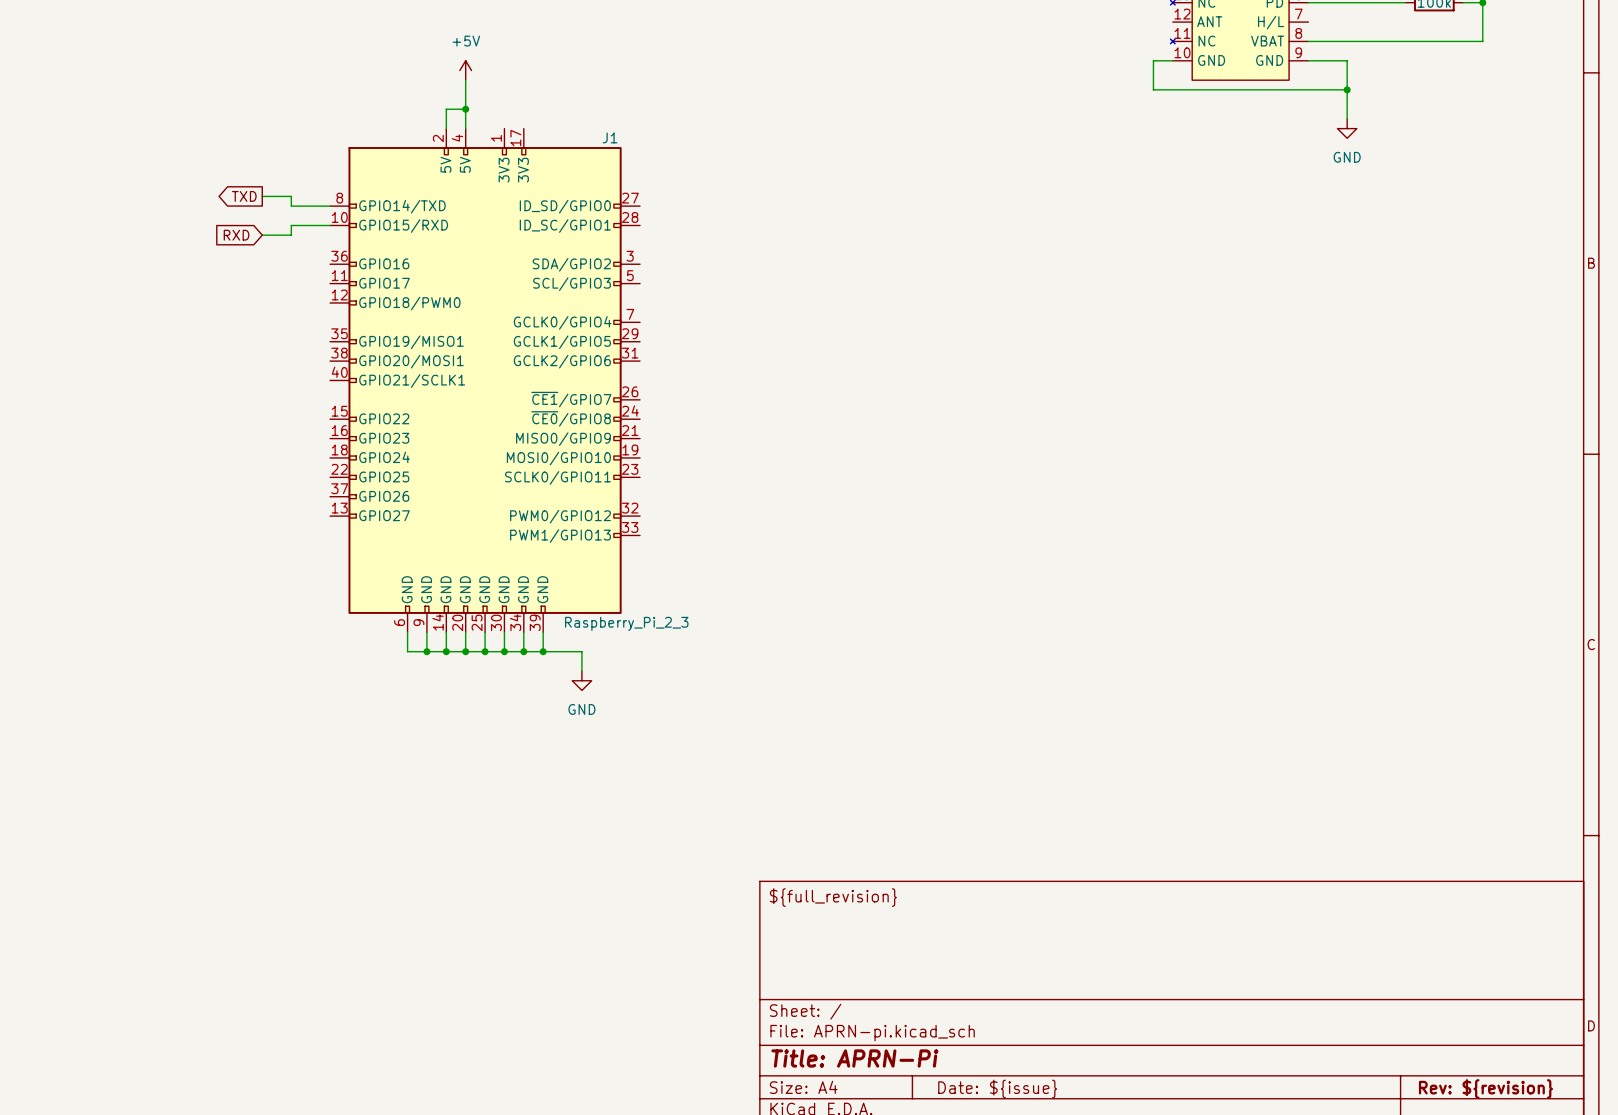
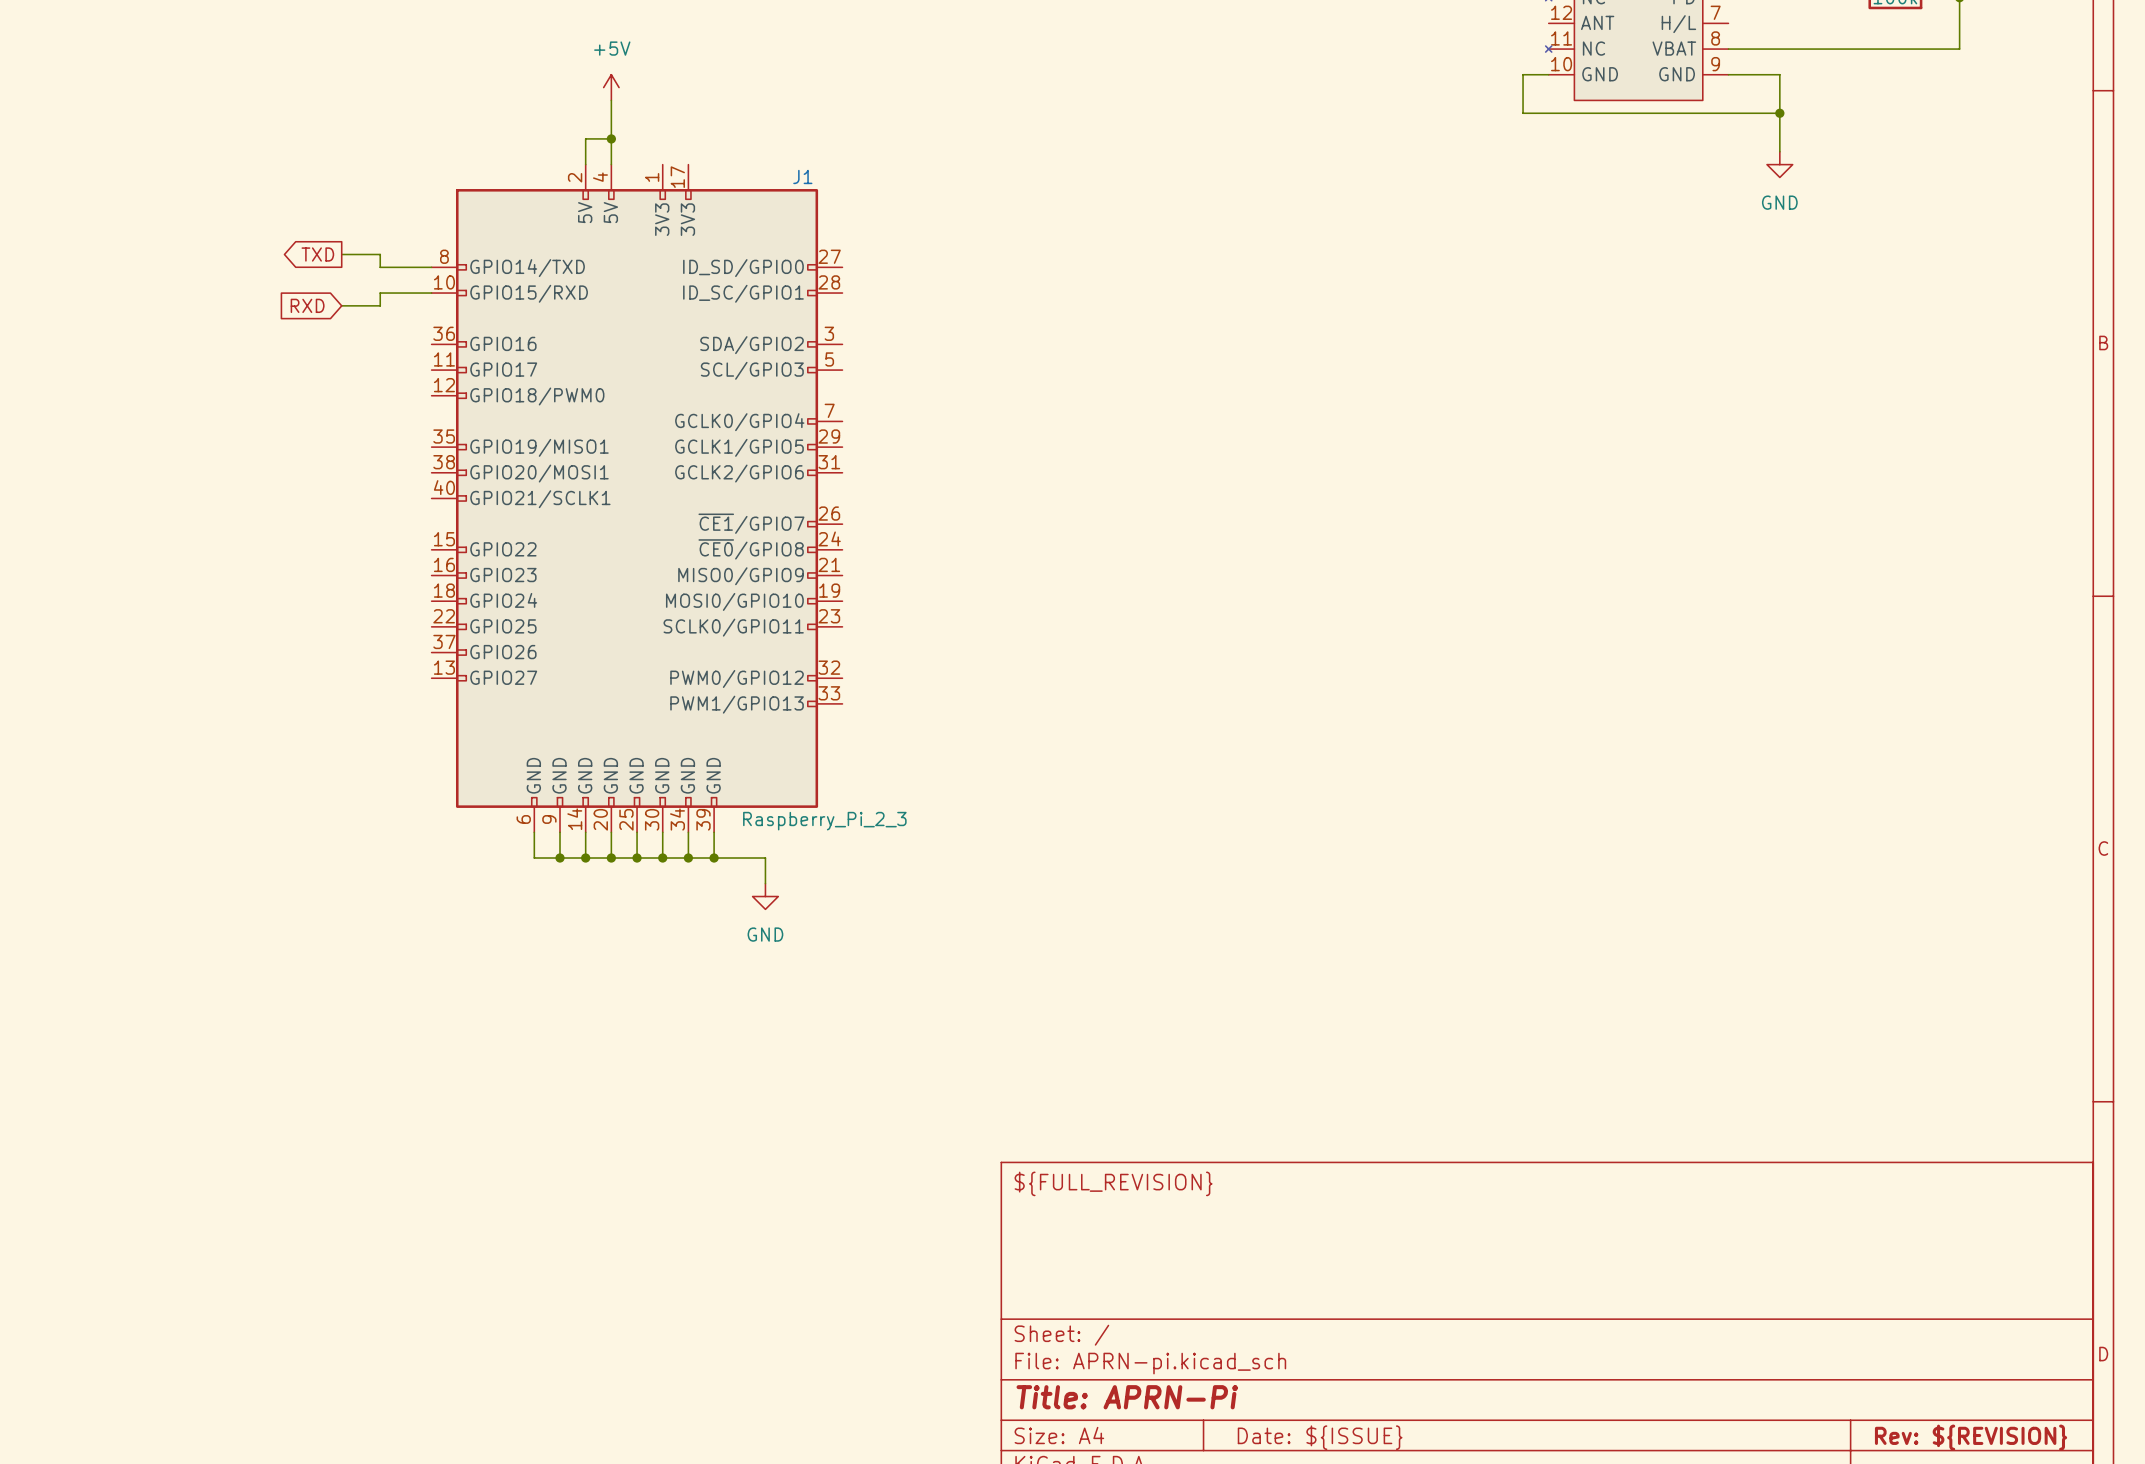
title block: ${full_revision} (833, 897) -> ${FULL_REVISION} (1113, 1183)
title block: Date: ${issue} (997, 1088) -> Date: ${ISSUE} (1320, 1437)
title block: Rev: ${revision} (1485, 1088) -> Rev: ${REVISION} (1971, 1437)

